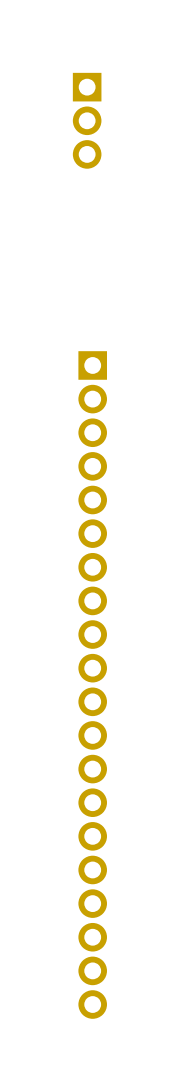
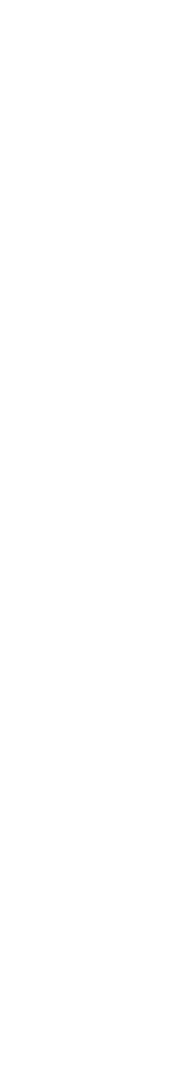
part: (87, 120) -> none
part: (92, 684) -> none

